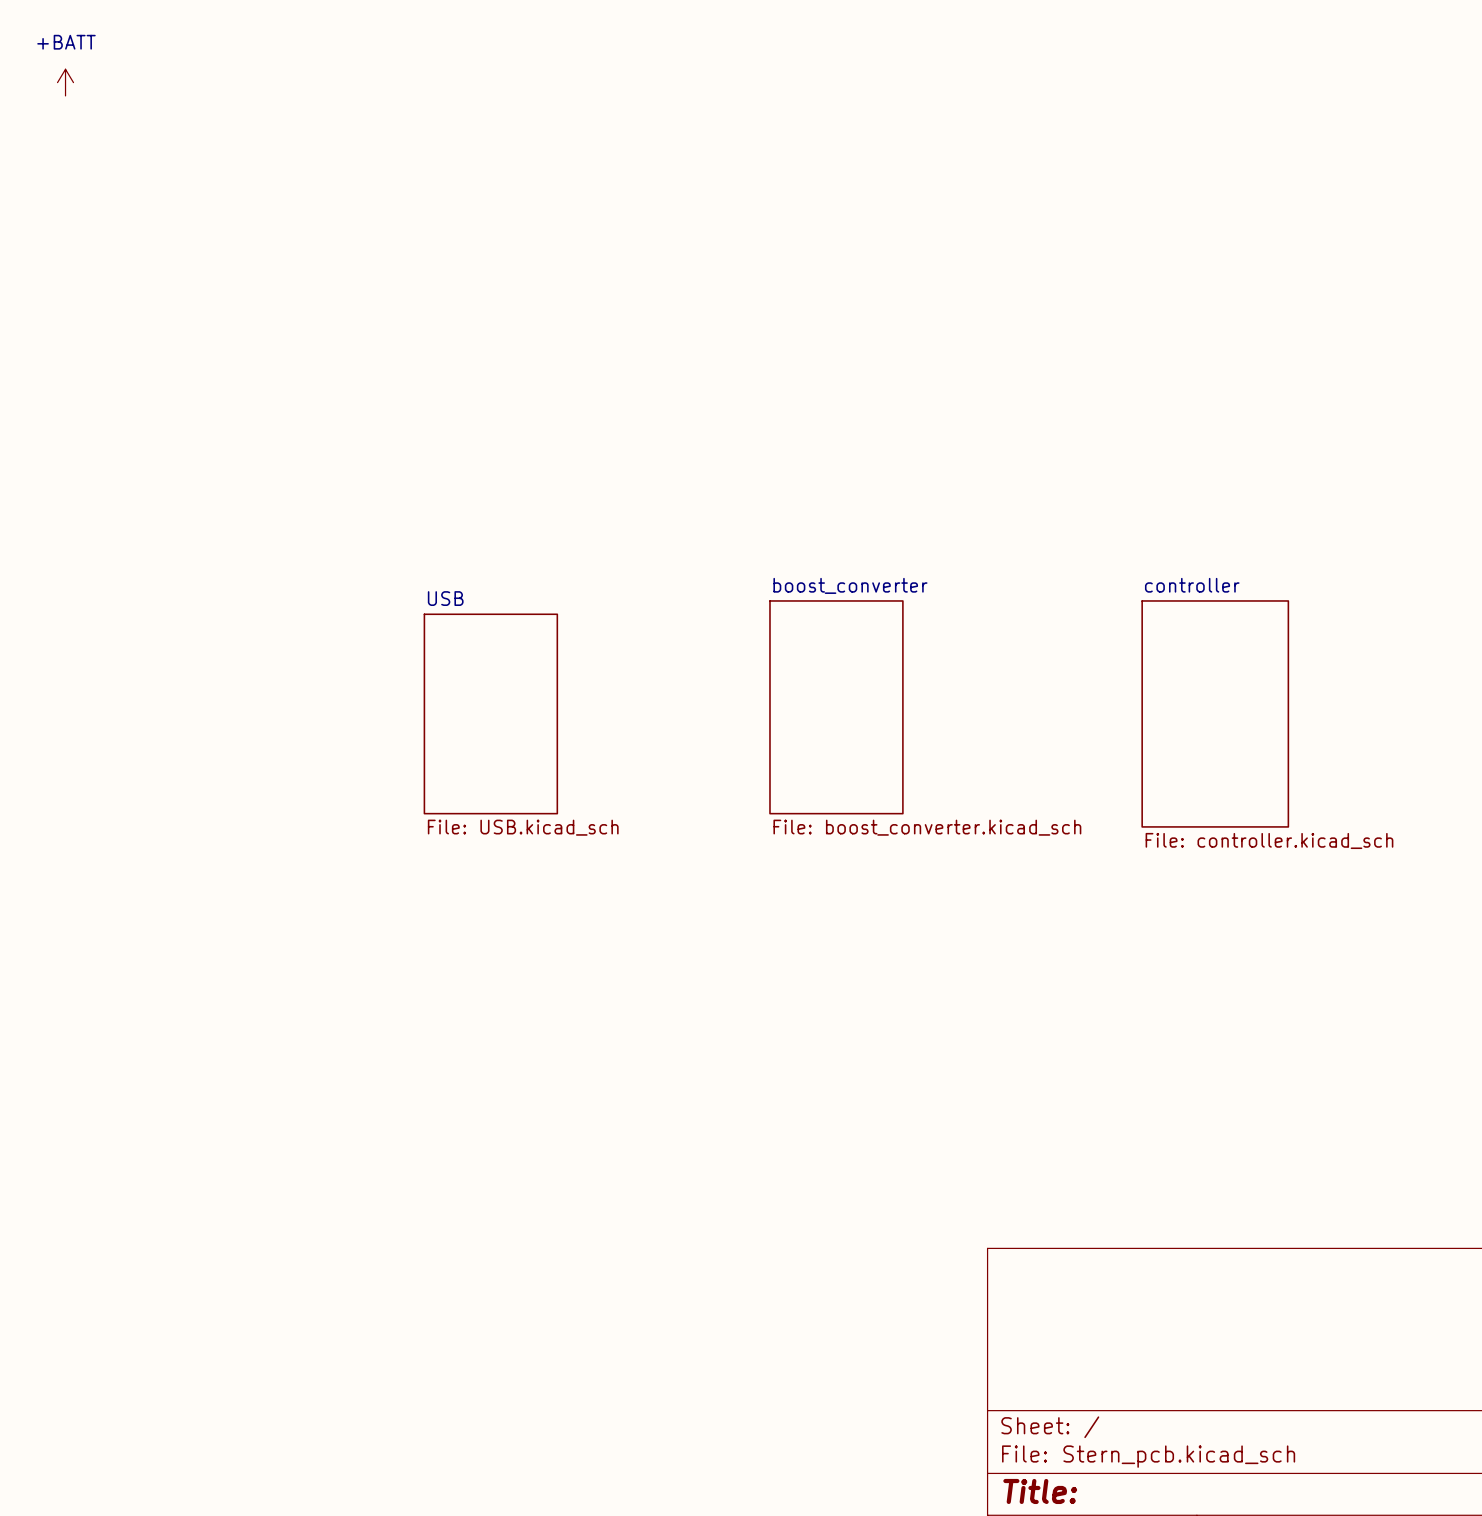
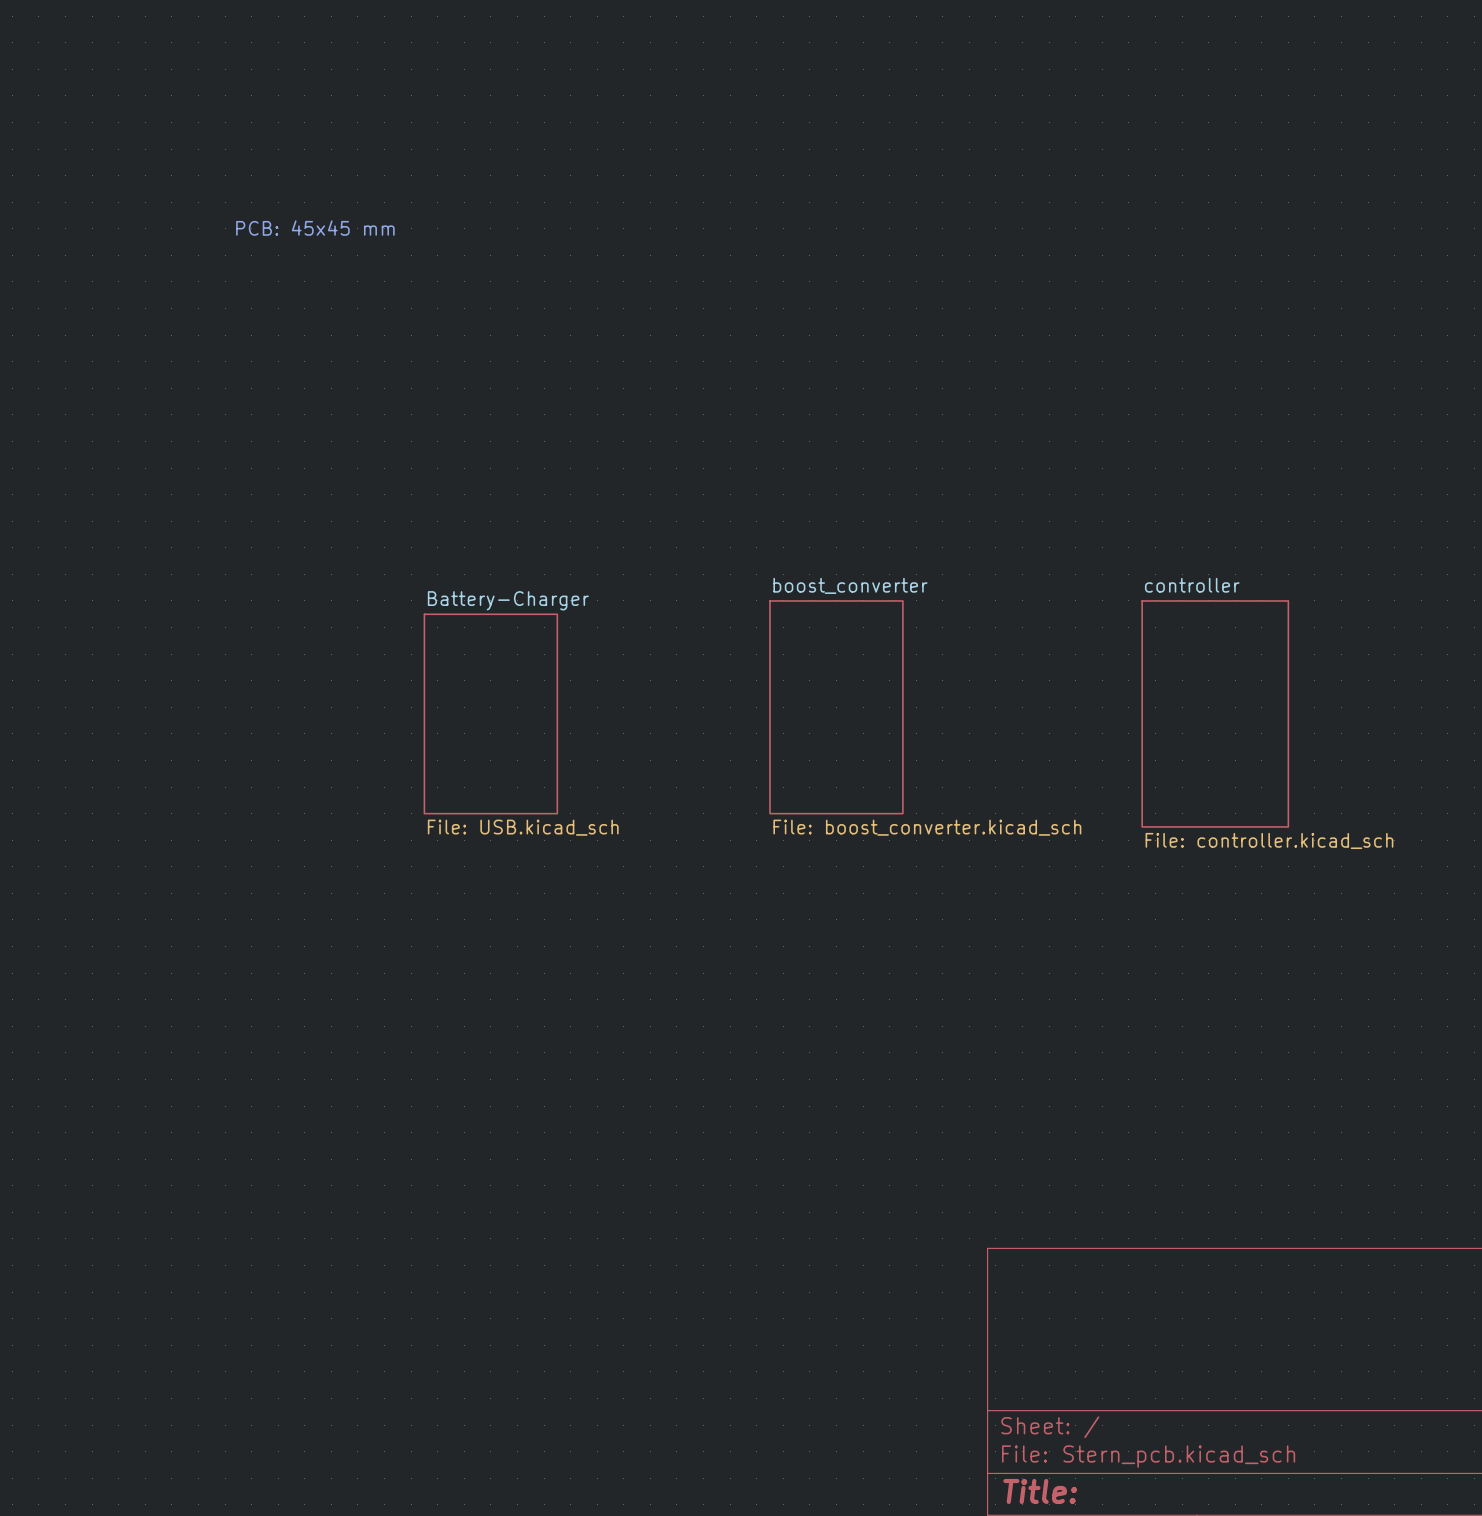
power symbol: +BATT (65, 82) -> none
text: none -> PCB: 45x45 mm (315, 228)
sheet USB name: USB (445, 598) -> Battery-Charger (508, 600)

